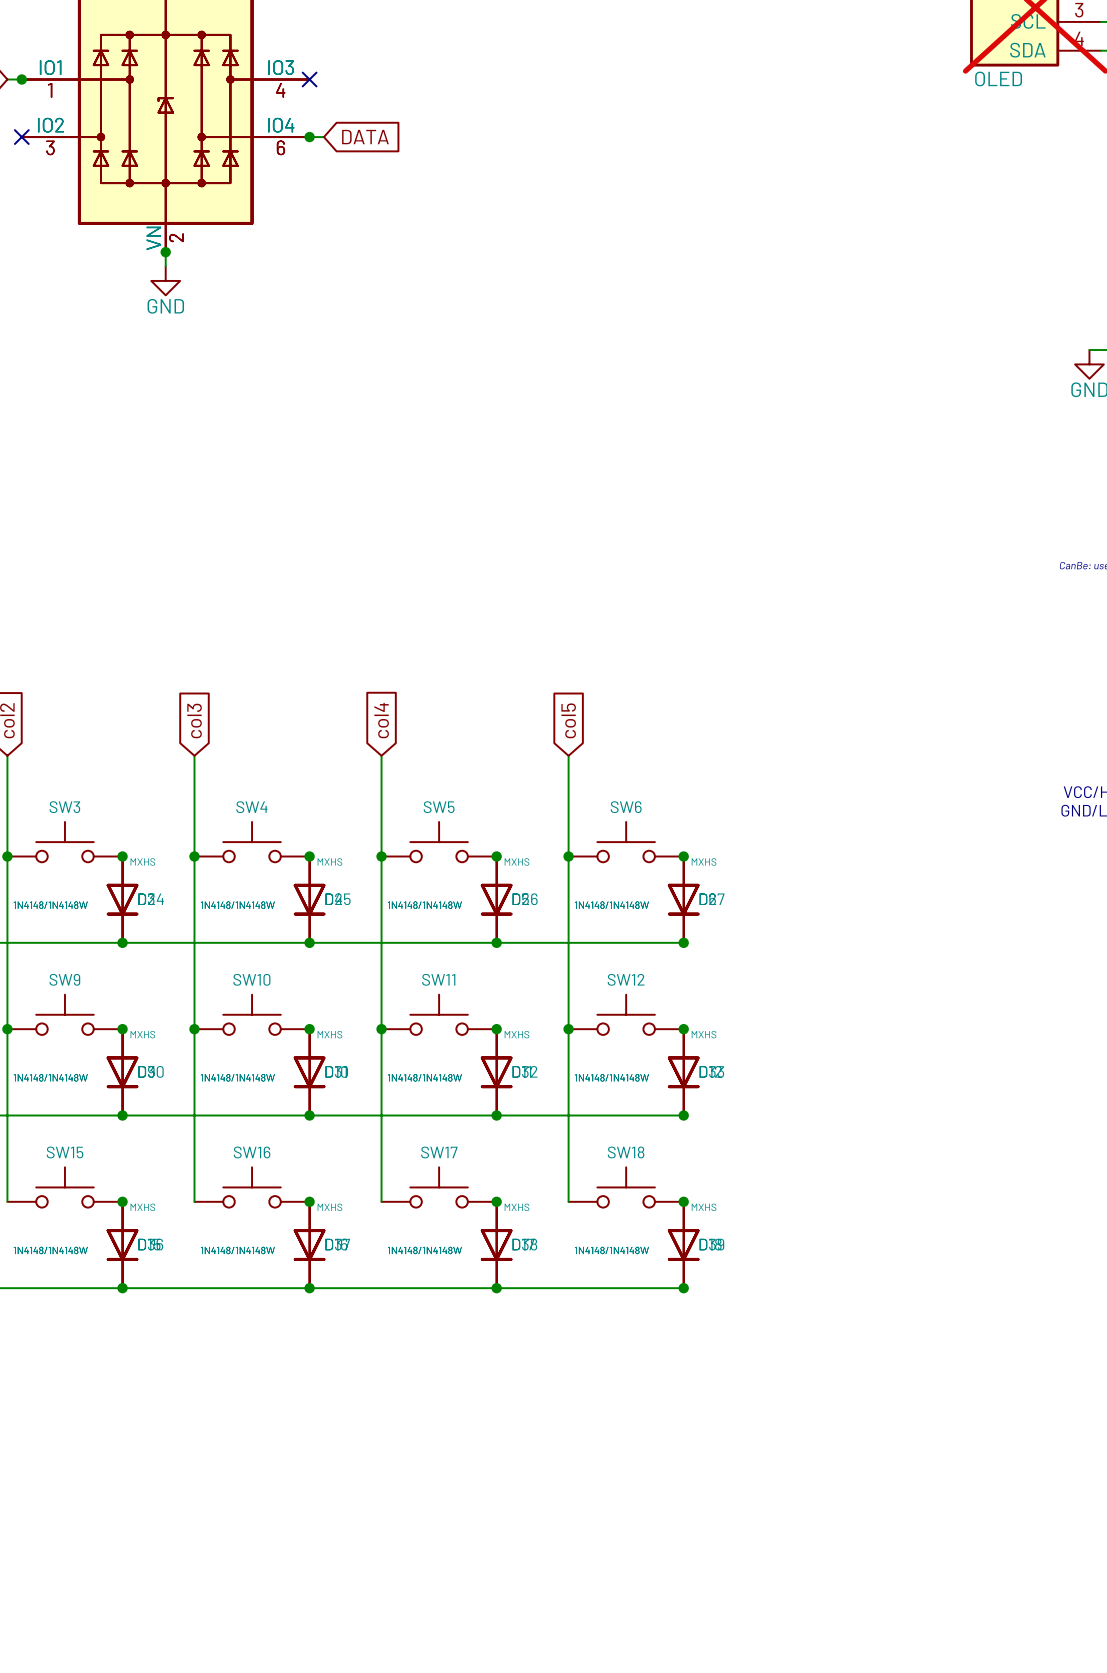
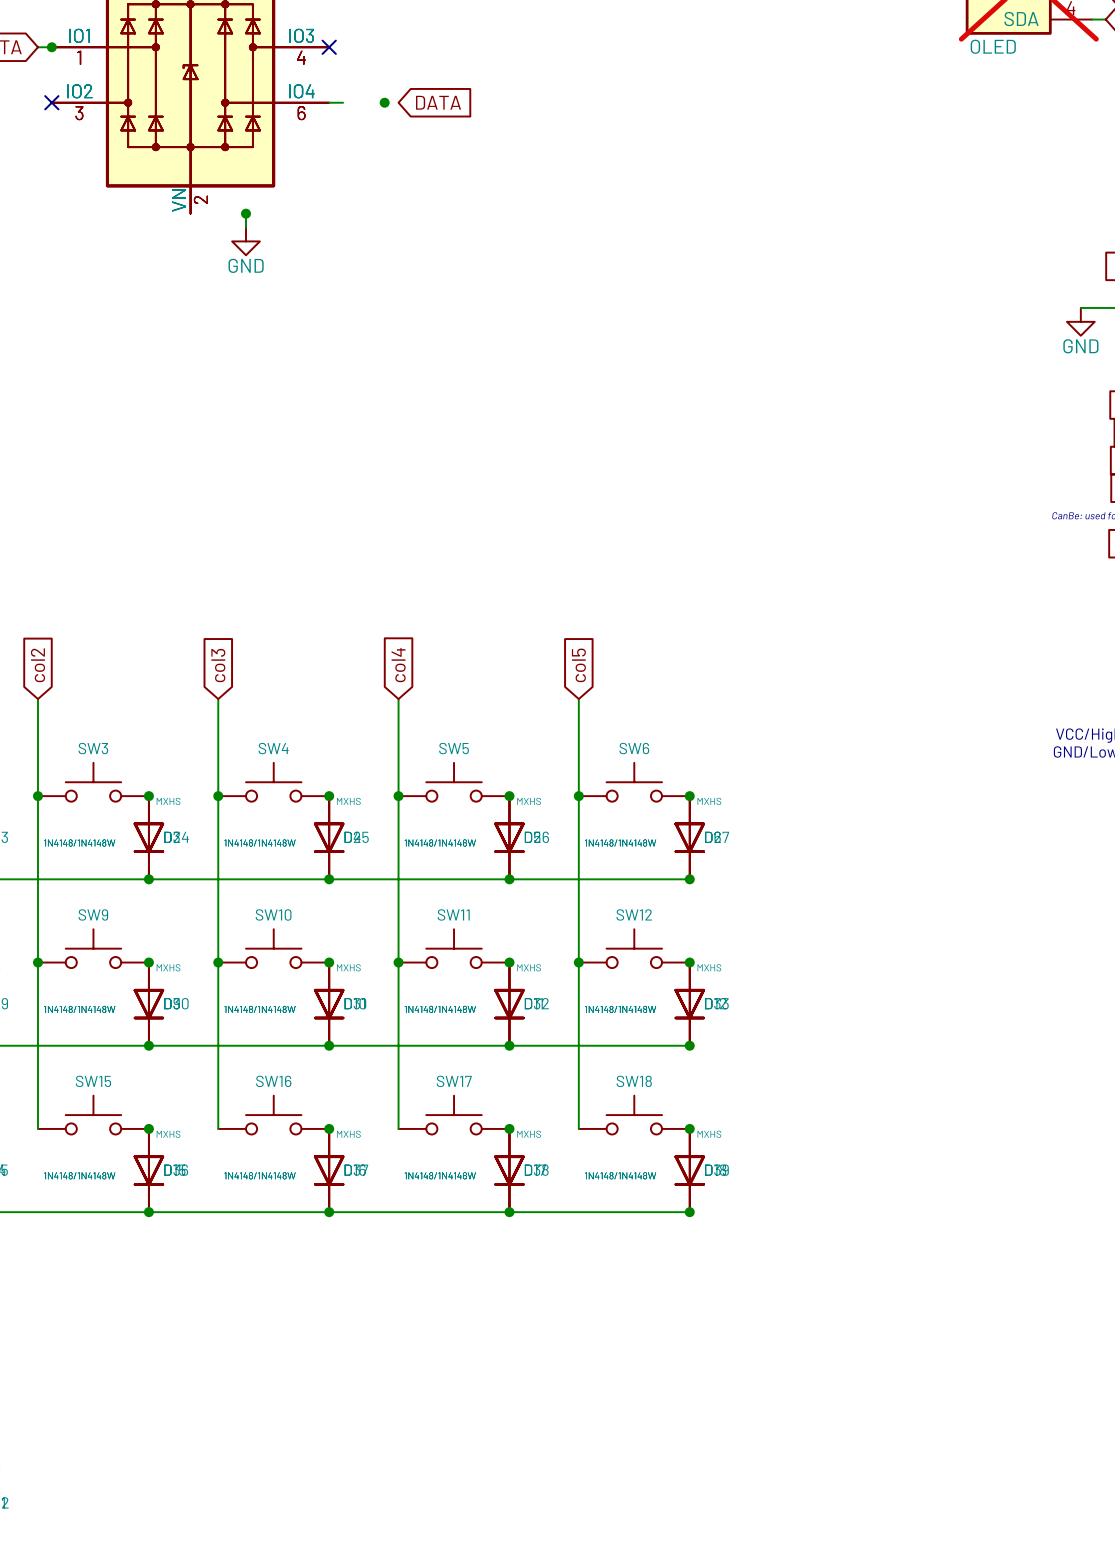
junction position: (309, 137) -> (384, 102)
global label position: DATA (365, 137) -> DATA (438, 102)
wire: (165, 252) (165, 266) -> (246, 213) (246, 227)
junction position: (165, 252) -> (246, 213)
power symbol position: GND (165, 280) -> GND (246, 241)

